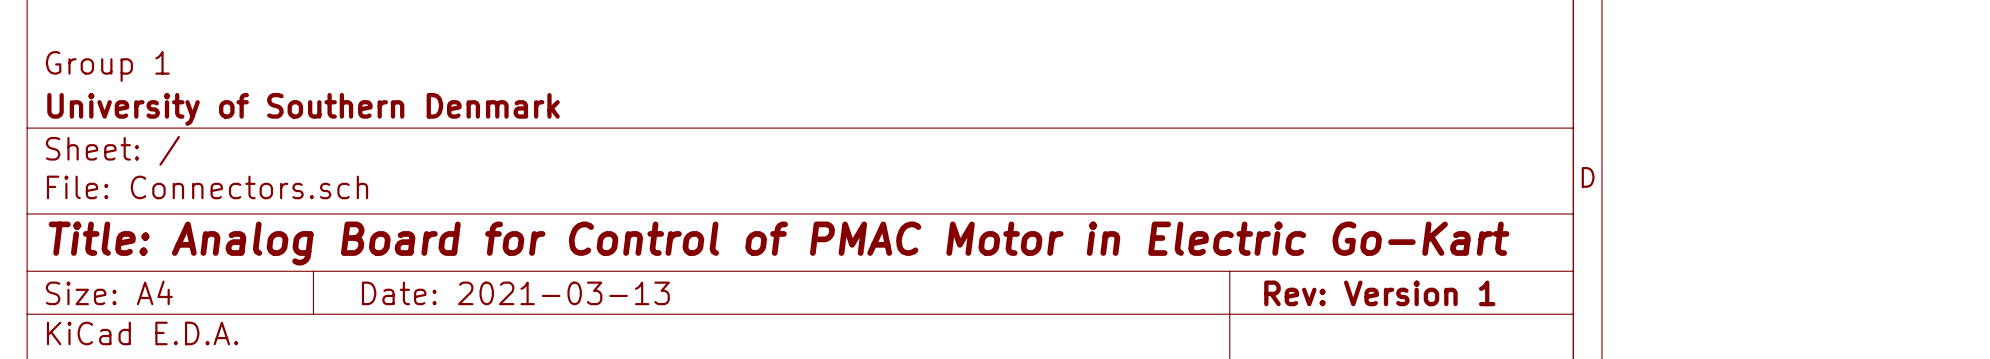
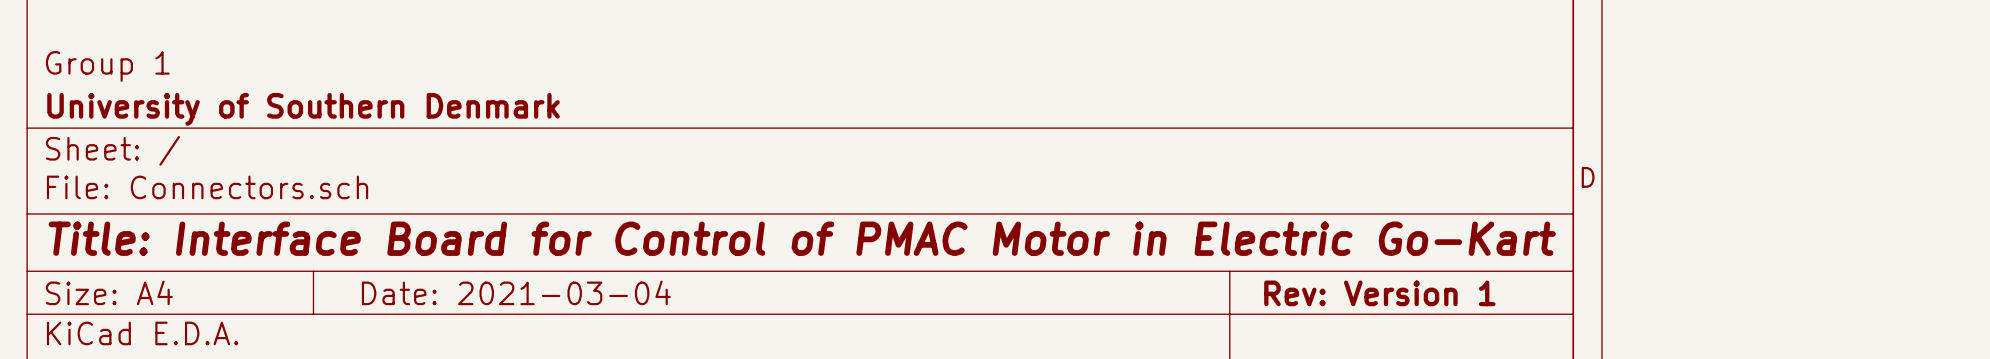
title block: Title: Analog Board for Control of PMAC Motor in Electric Go-Kart (779, 243) -> Title: Interface Board for Control of PMAC Motor in Electric Go-Kart (802, 238)
title block: Date: 2021-03-13 (515, 293) -> Date: 2021-03-04 (516, 292)

